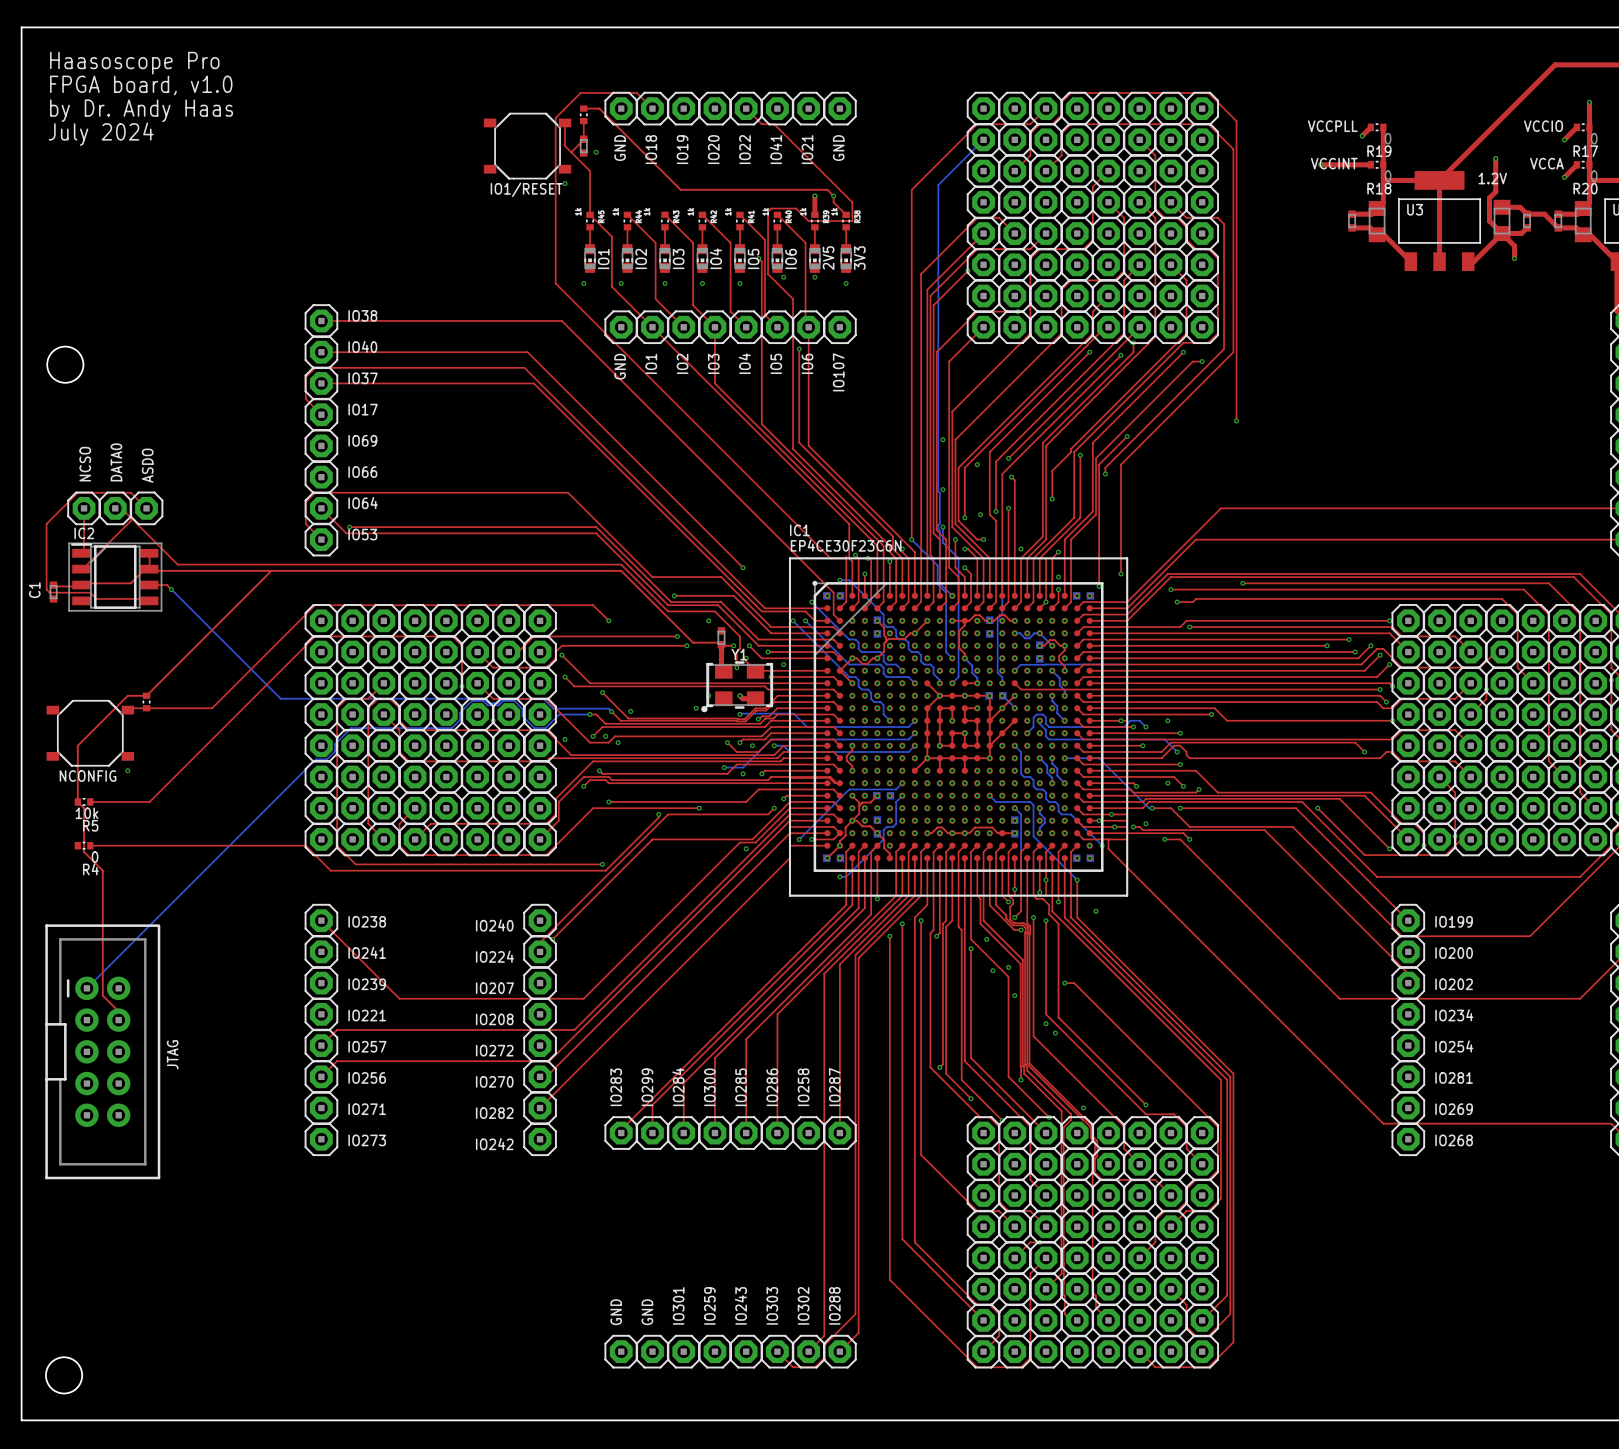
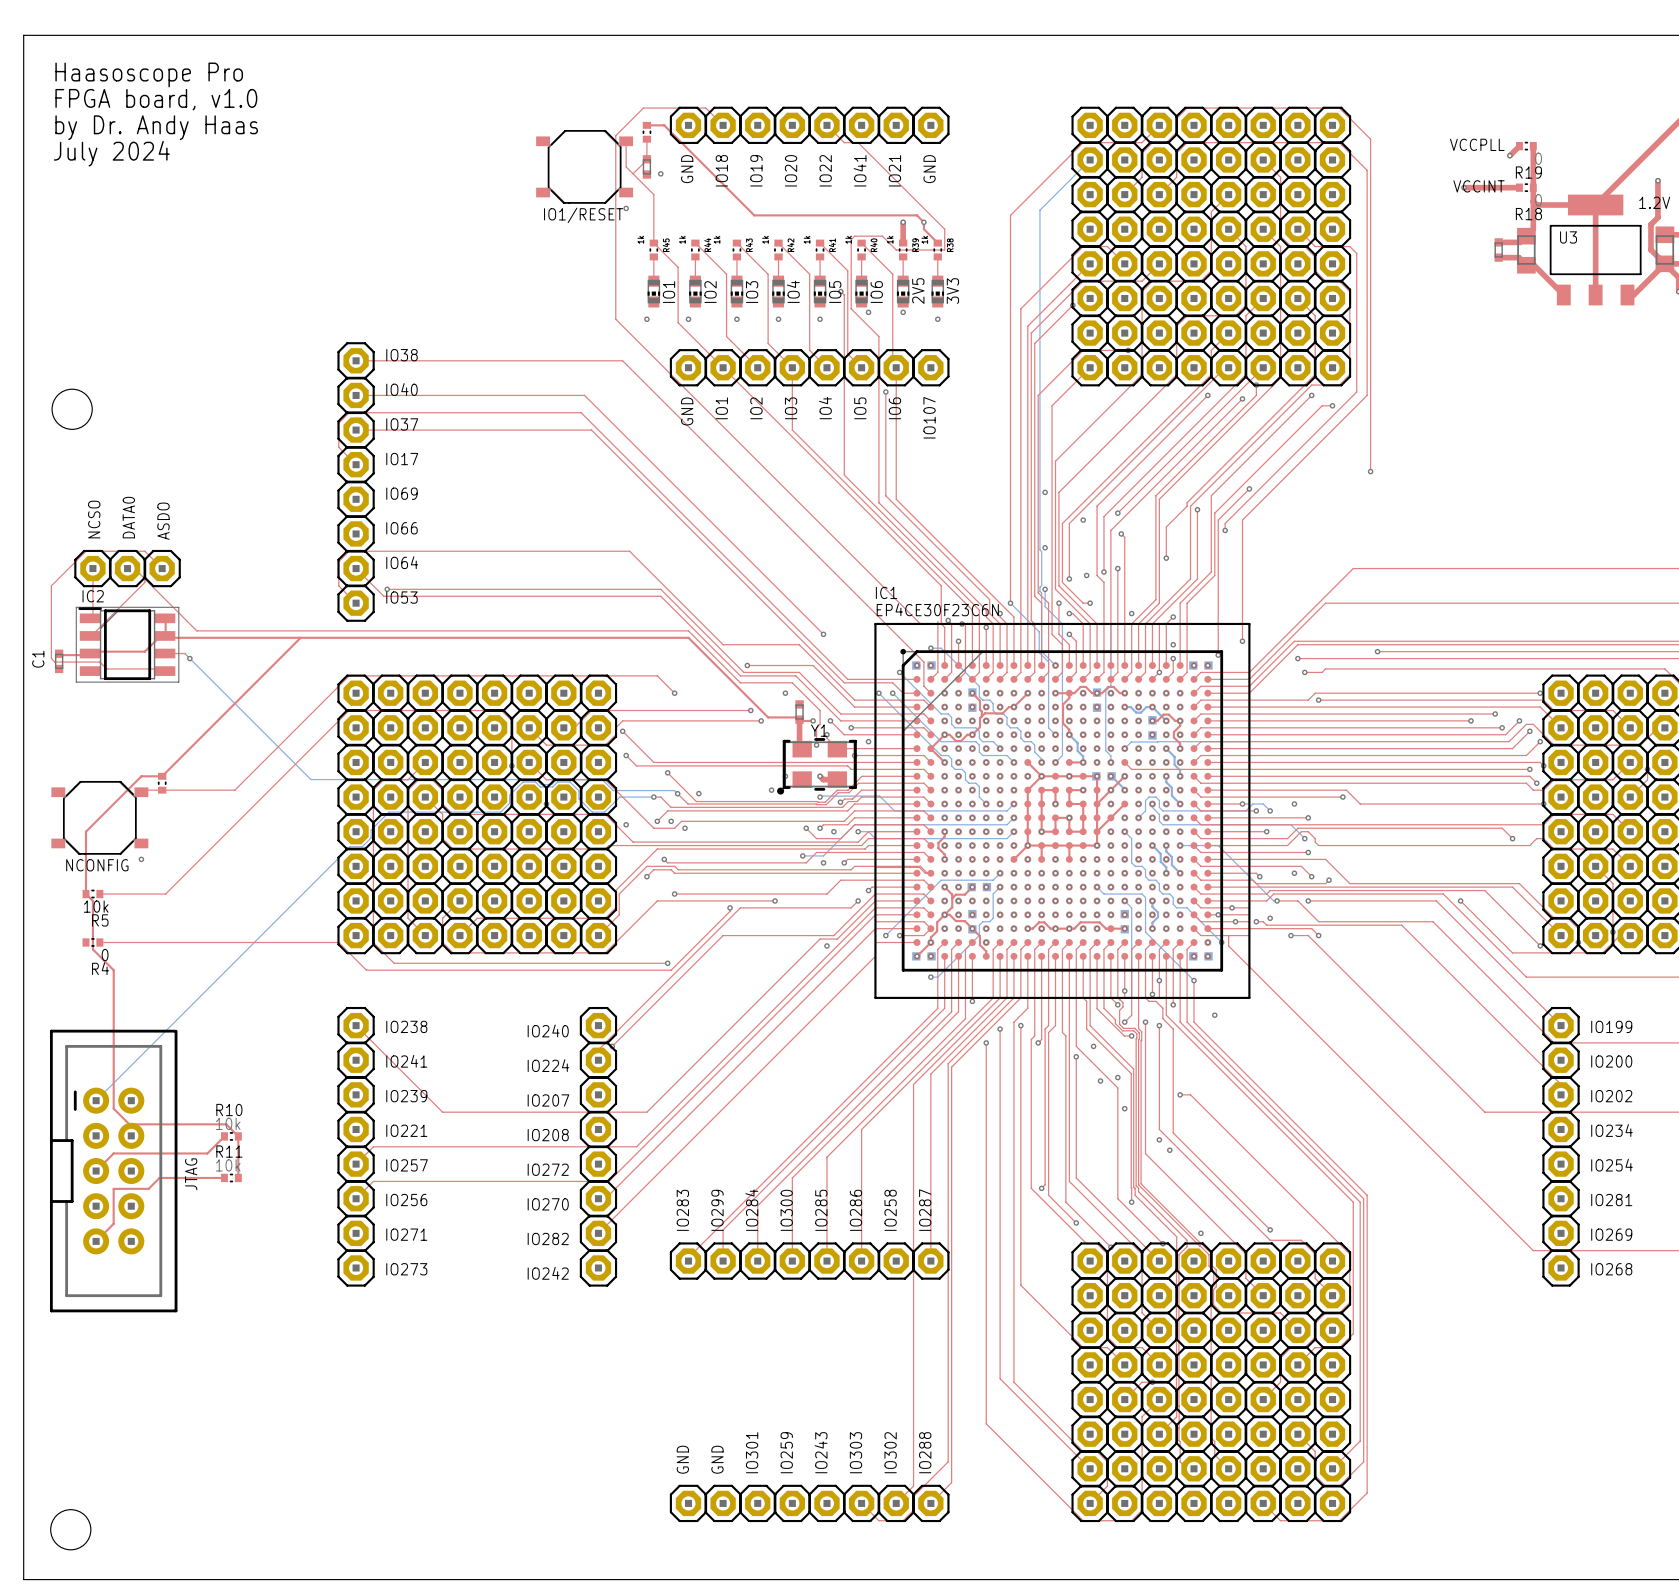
top track: none -> (127, 1124) (226, 1124) (238, 1136) (238, 1177)
top track: none -> (224, 1136) (207, 1153) (113, 1153) (96, 1171)
R10: none -> 10k (231, 1136)
top track: none -> (224, 1177) (159, 1177) (148, 1188) (113, 1188) (113, 1223) (96, 1241)
R11: none -> 10k (231, 1177)

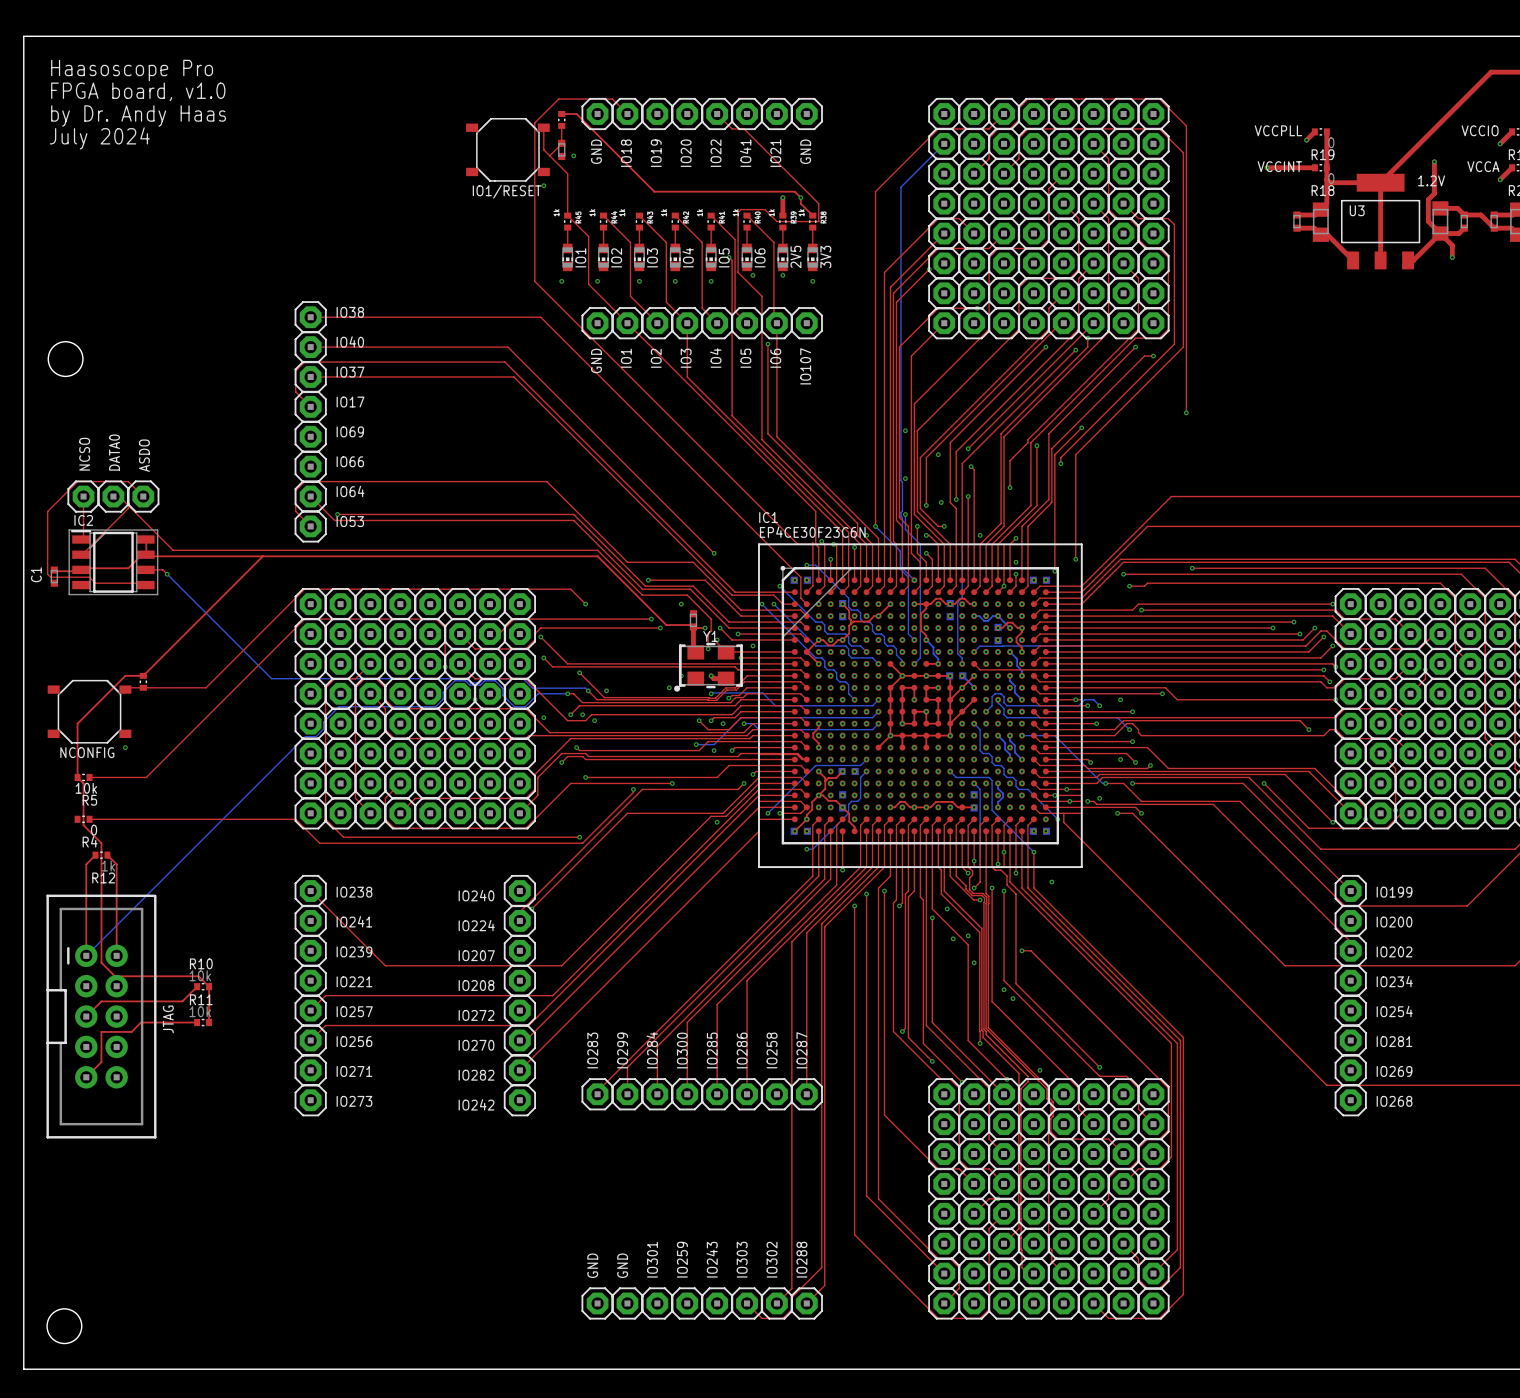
top track: none -> (95, 855) (86, 864) (86, 955)
R12: none -> 1k (101, 855)
top track: none -> (107, 855) (116, 864) (116, 955)

